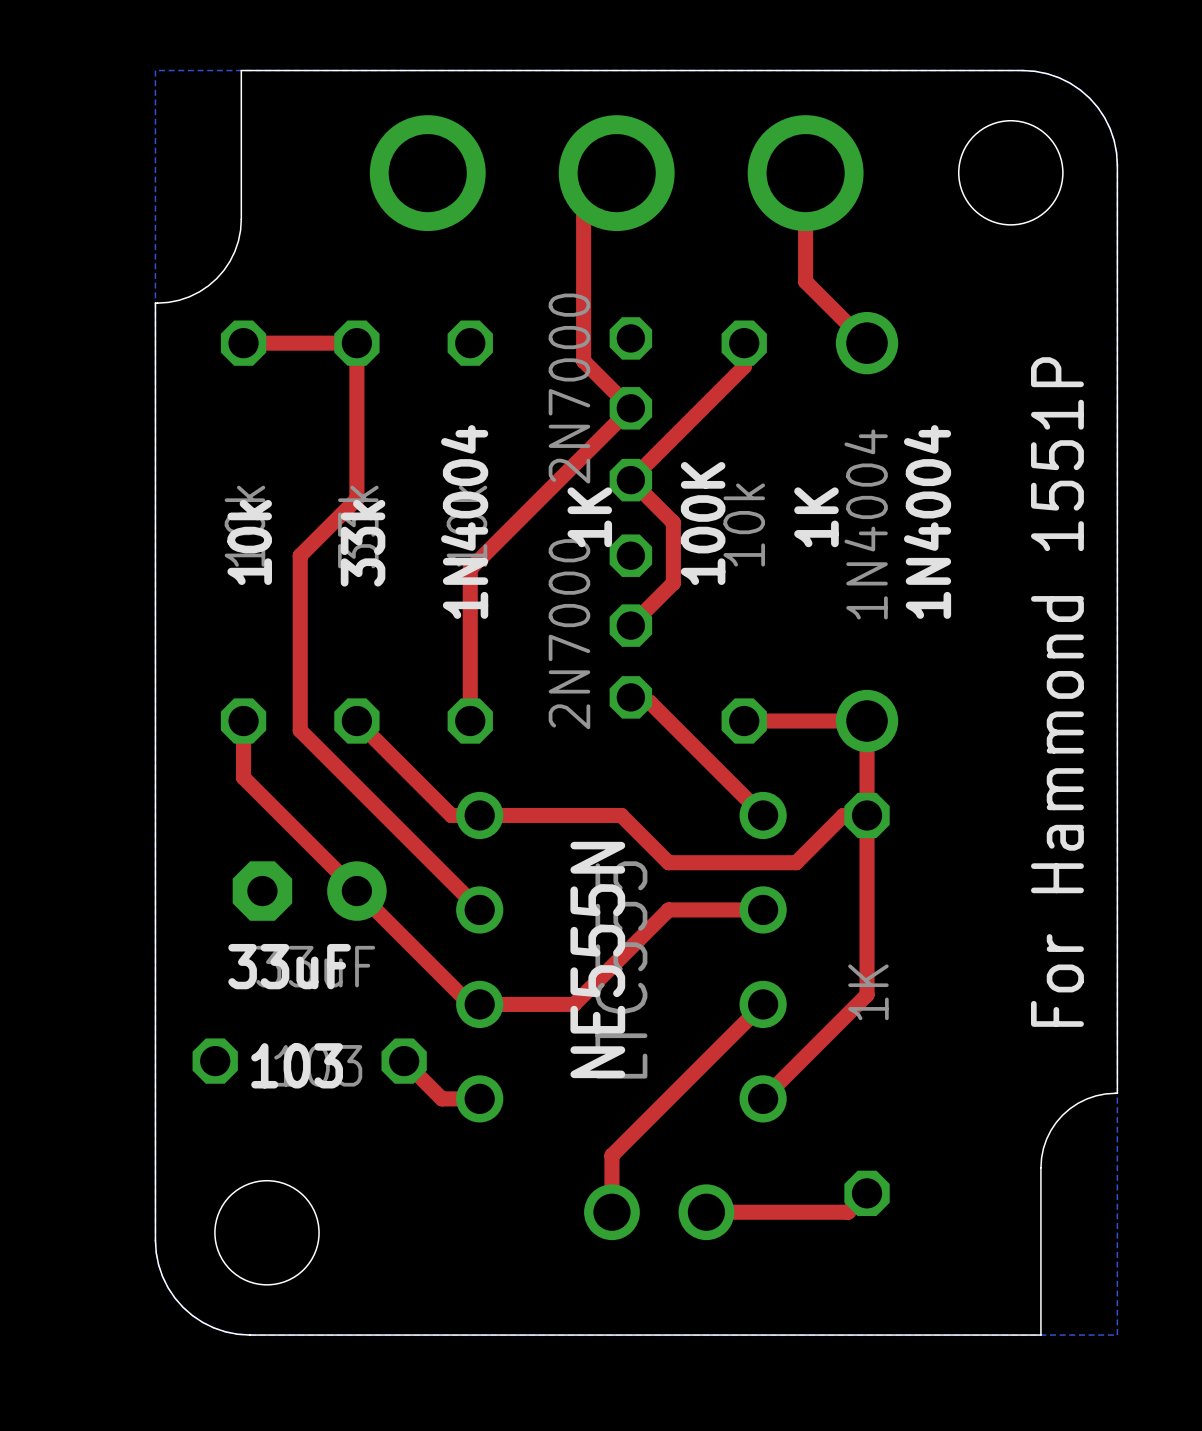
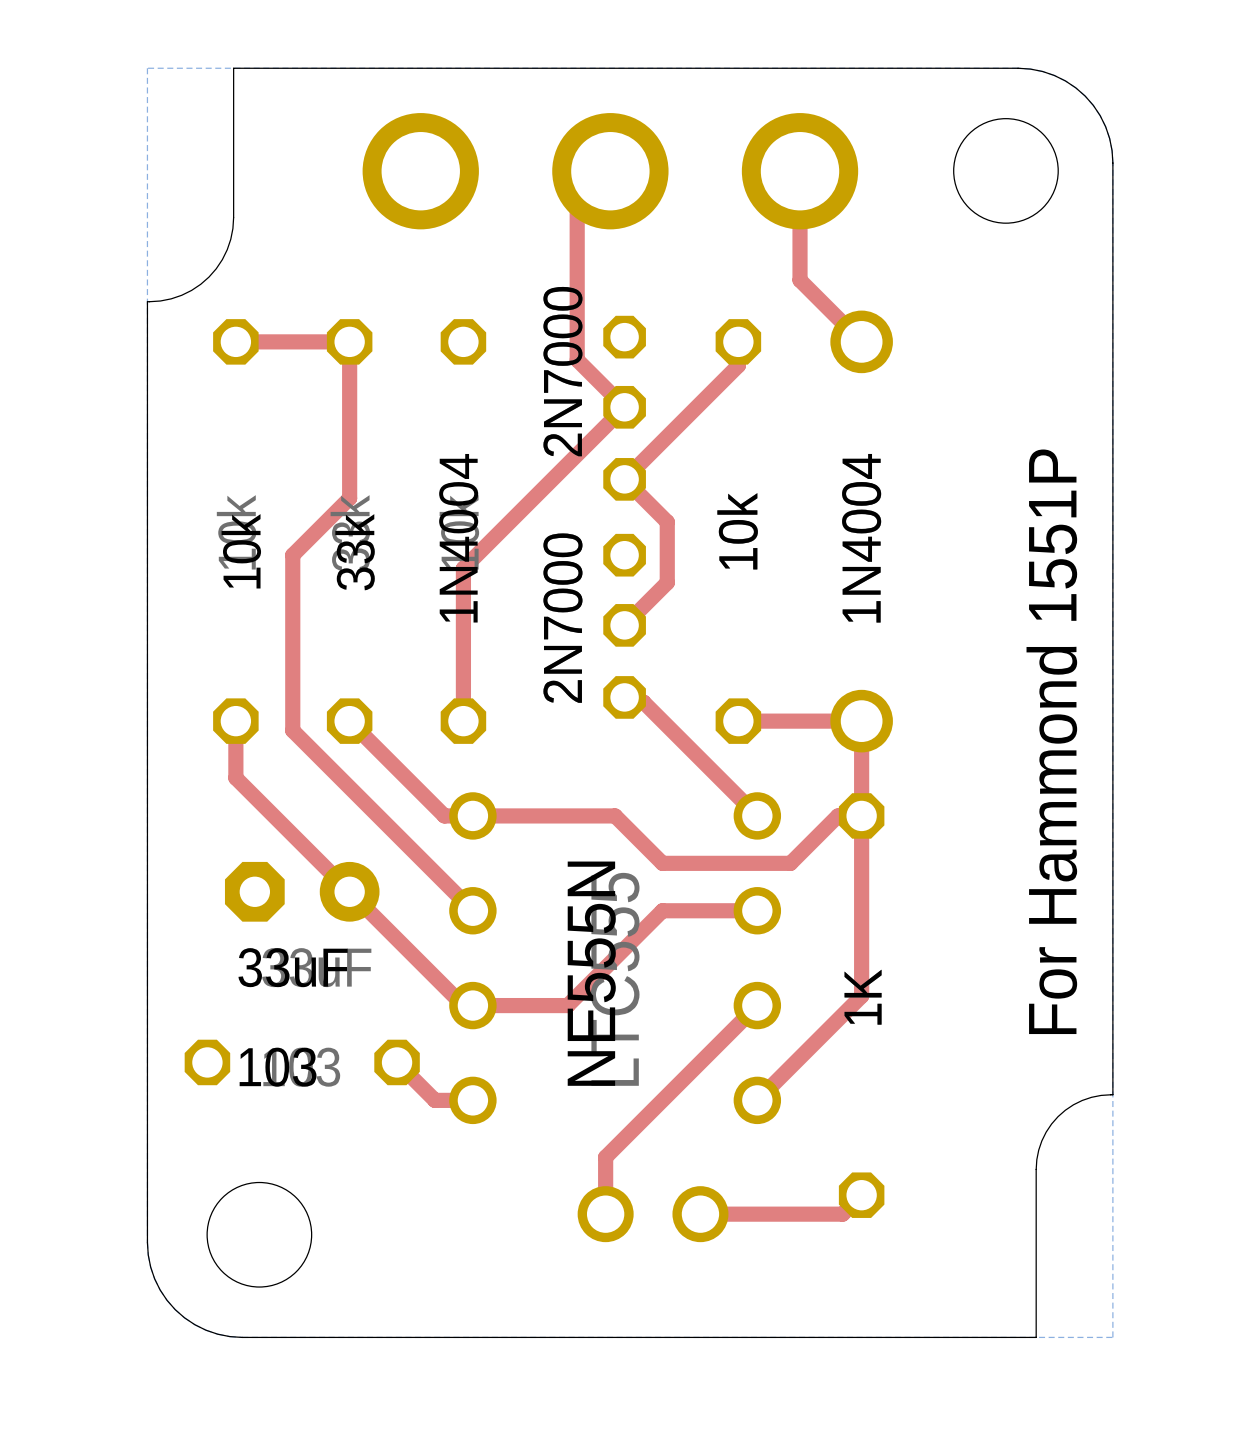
text: none -> 2N7000 (562, 371)
text: 1K (589, 517) -> none
text: 1K (816, 517) -> none
text position: 1N4004 (927, 521) -> 1N4004 (861, 538)
text: none -> 10k (737, 531)
text: 100K (703, 523) -> none
text: none -> 2N7000 (562, 618)
text: none -> 1K (863, 997)

